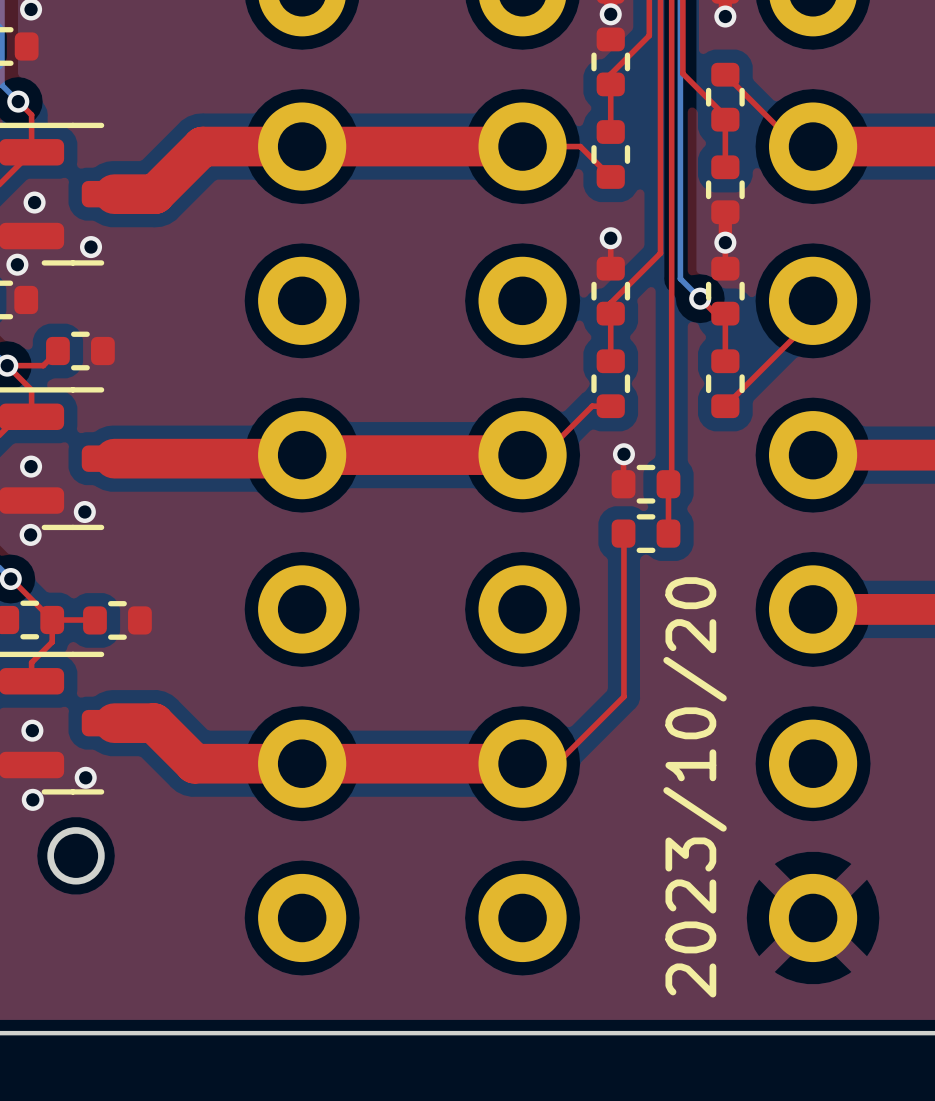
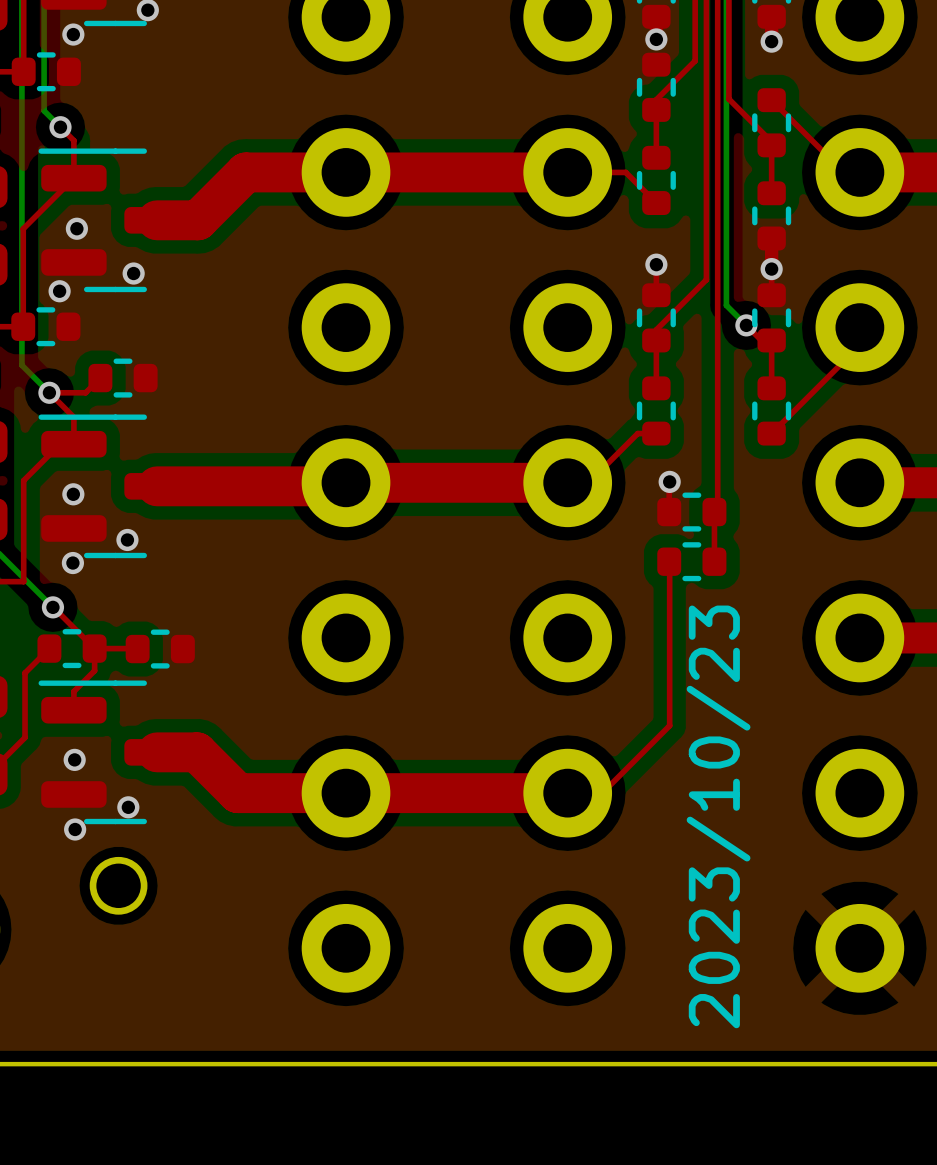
text: 2023/10/20 (695, 787) -> 2023/10/23 (718, 816)

